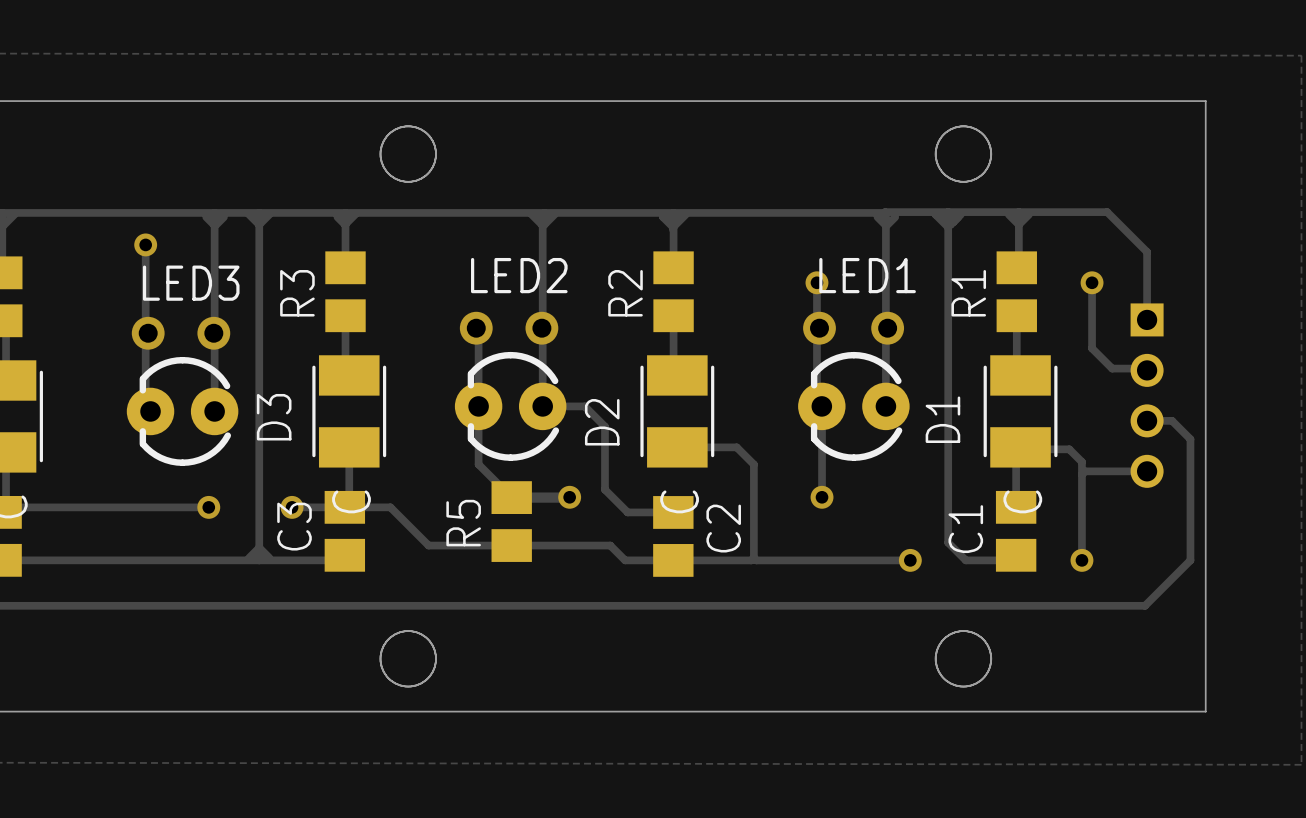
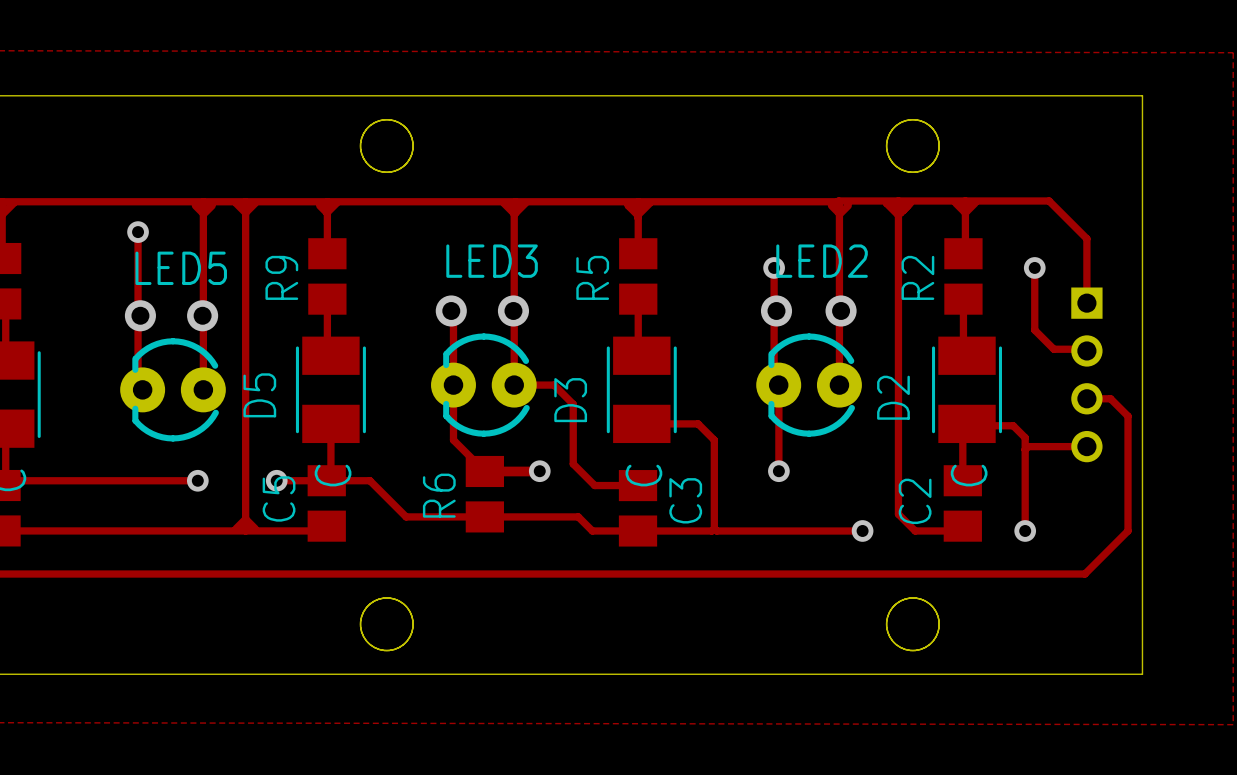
LED2 name: LED2 (519, 275) -> LED3 (492, 261)
LED1 name: LED1 (867, 275) -> LED2 (822, 261)
LED3 name: LED3 (191, 283) -> LED5 (181, 268)
R3 name: R3 (297, 293) -> R9 (281, 277)
R2 name: R2 (625, 293) -> R5 (592, 277)
R1 name: R1 (968, 293) -> R2 (917, 277)
D3 name: D3 (274, 417) -> D5 (259, 395)
D1 name: D1 (942, 419) -> D2 (893, 397)
D2 name: D2 (602, 422) -> D3 (570, 400)
R5 name: R5 (463, 523) -> R6 (439, 495)
C3 name: C3 (294, 526) -> C5 (279, 498)
C2 name: C2 (723, 528) -> C3 (685, 500)
C1 name: C1 (965, 529) -> C2 (915, 501)

